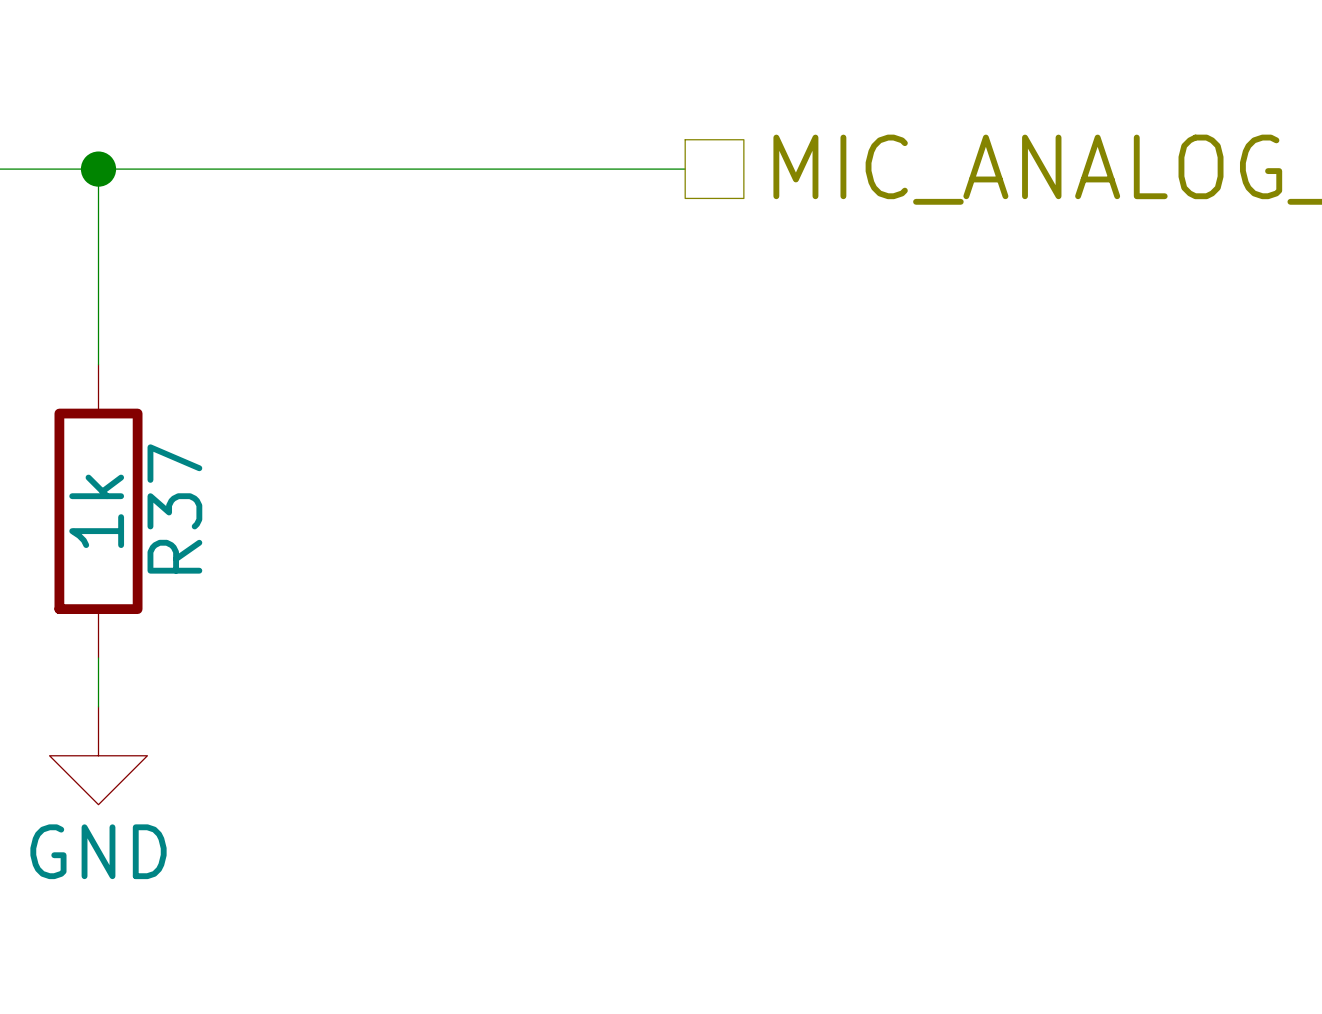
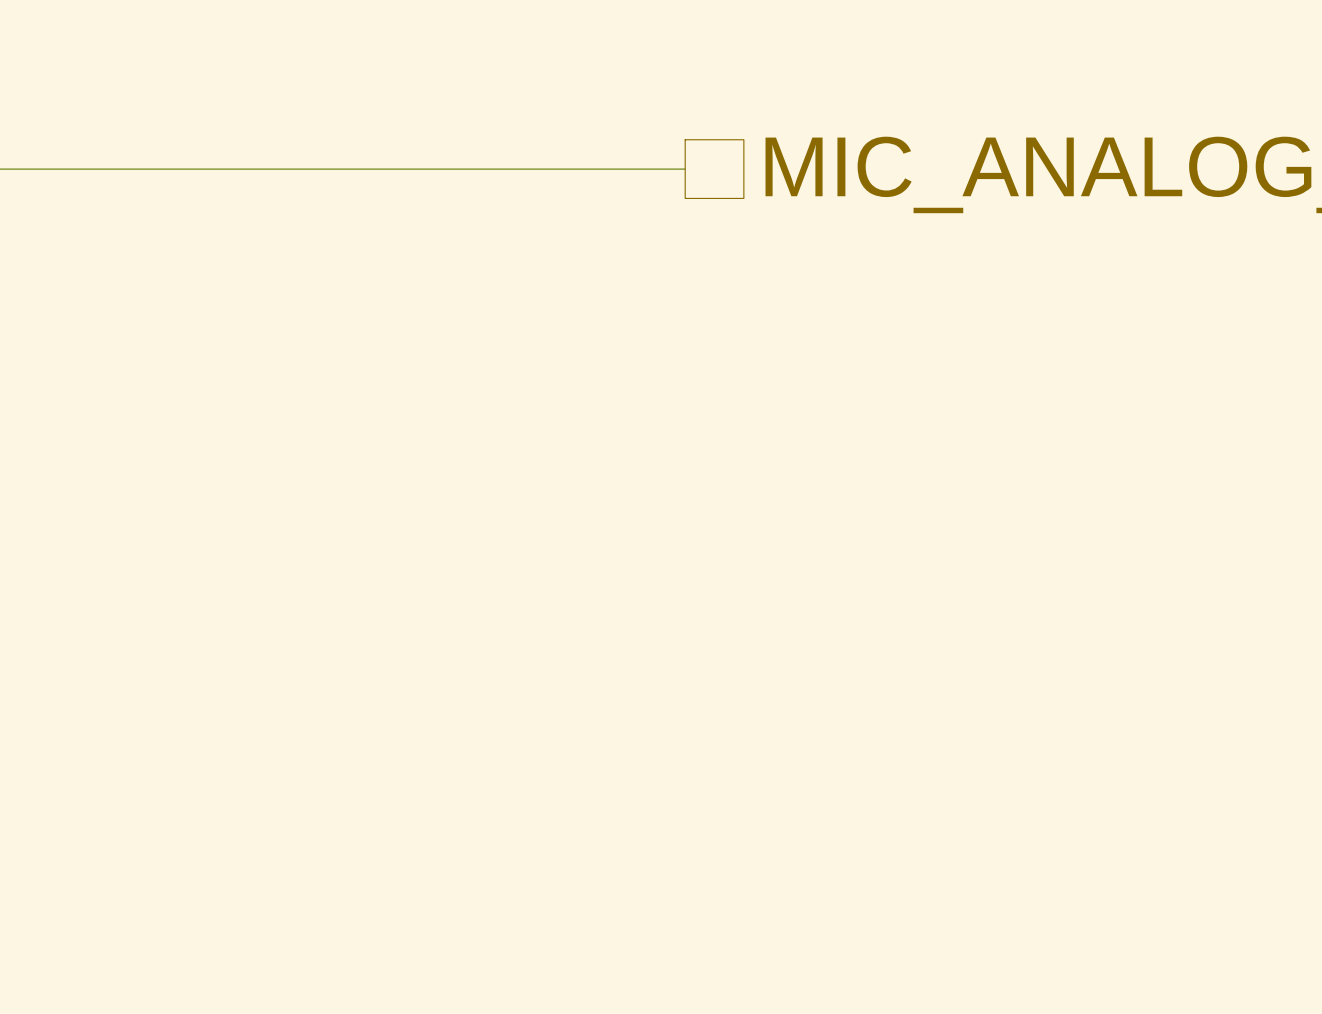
wire: (98, 169) (98, 364) -> none
junction: (98, 169) -> none
R37: 1k (98, 511) -> none
wire: (98, 658) (98, 706) -> none
power symbol: GND (98, 755) -> none

